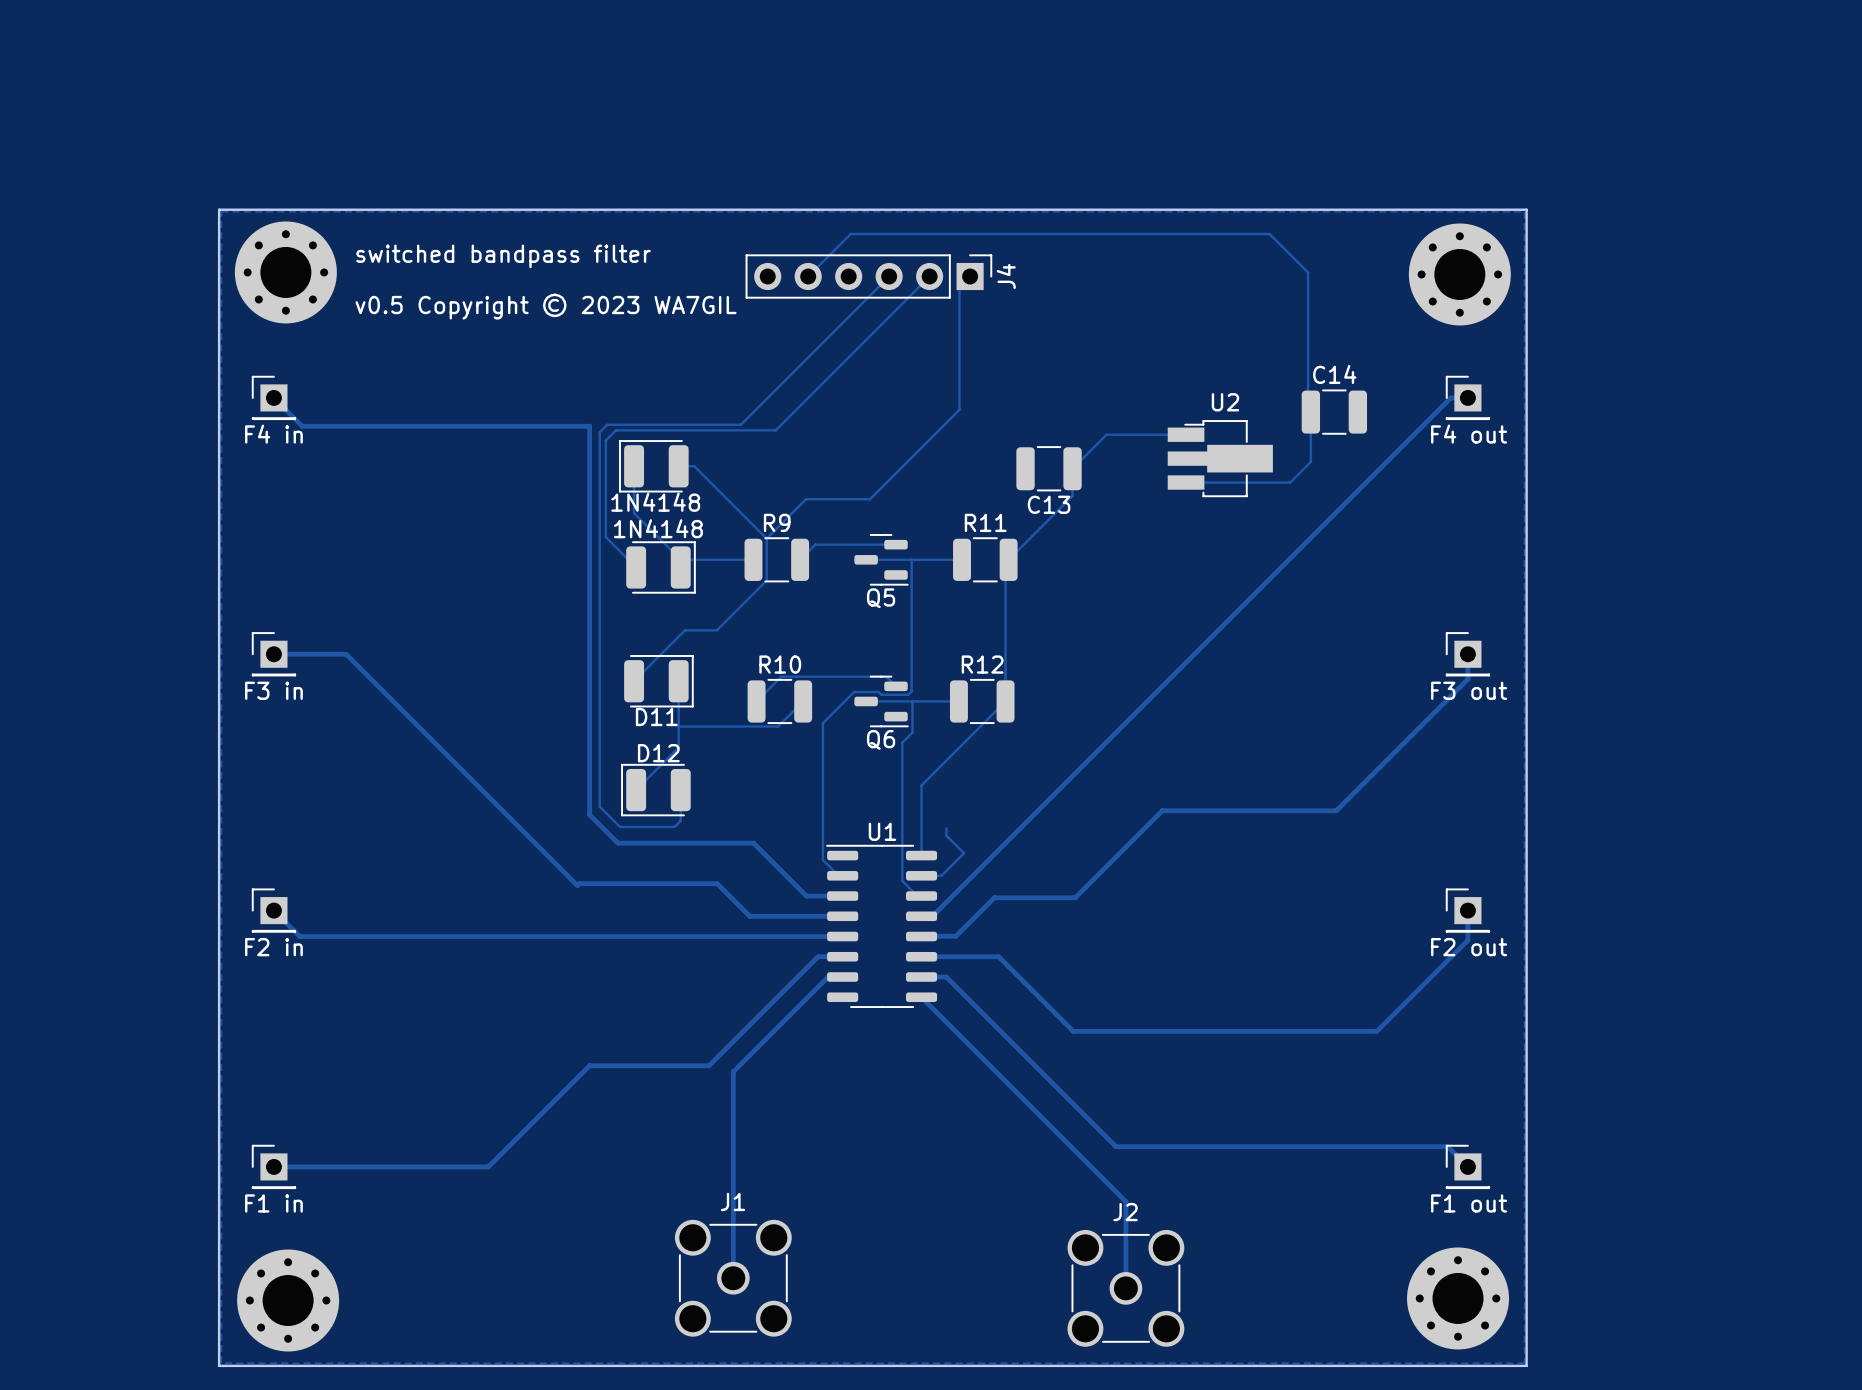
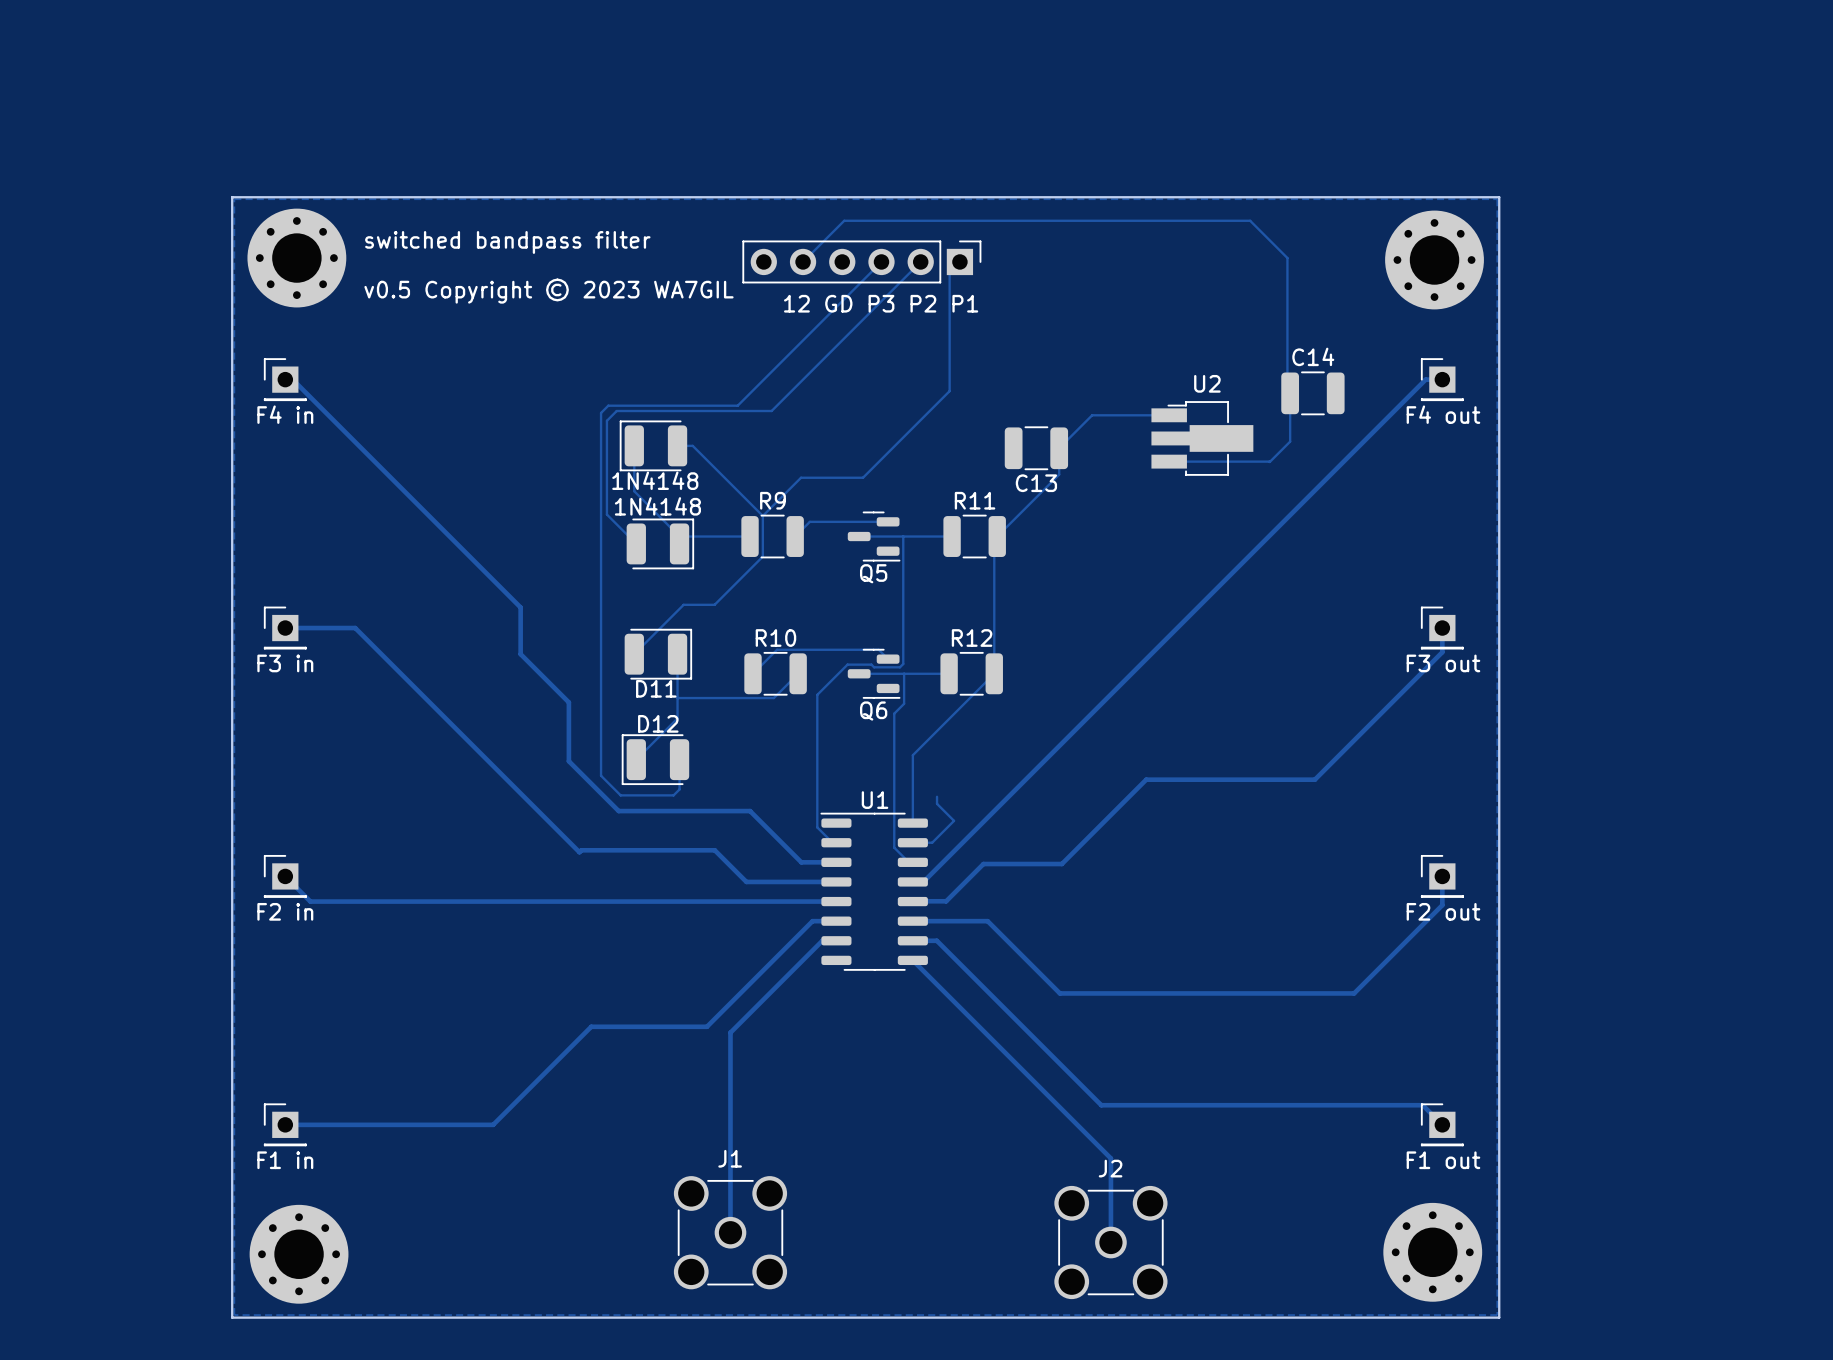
J4 name: J4 (1006, 276) -> none
text: none -> 12 GD P3 P2 P1 (881, 303)
track: (273, 397) (302, 426) (589, 426) (589, 814) -> (285, 379) (292, 379) (520, 607) (520, 654) (568, 702) (568, 761) (591, 783)

